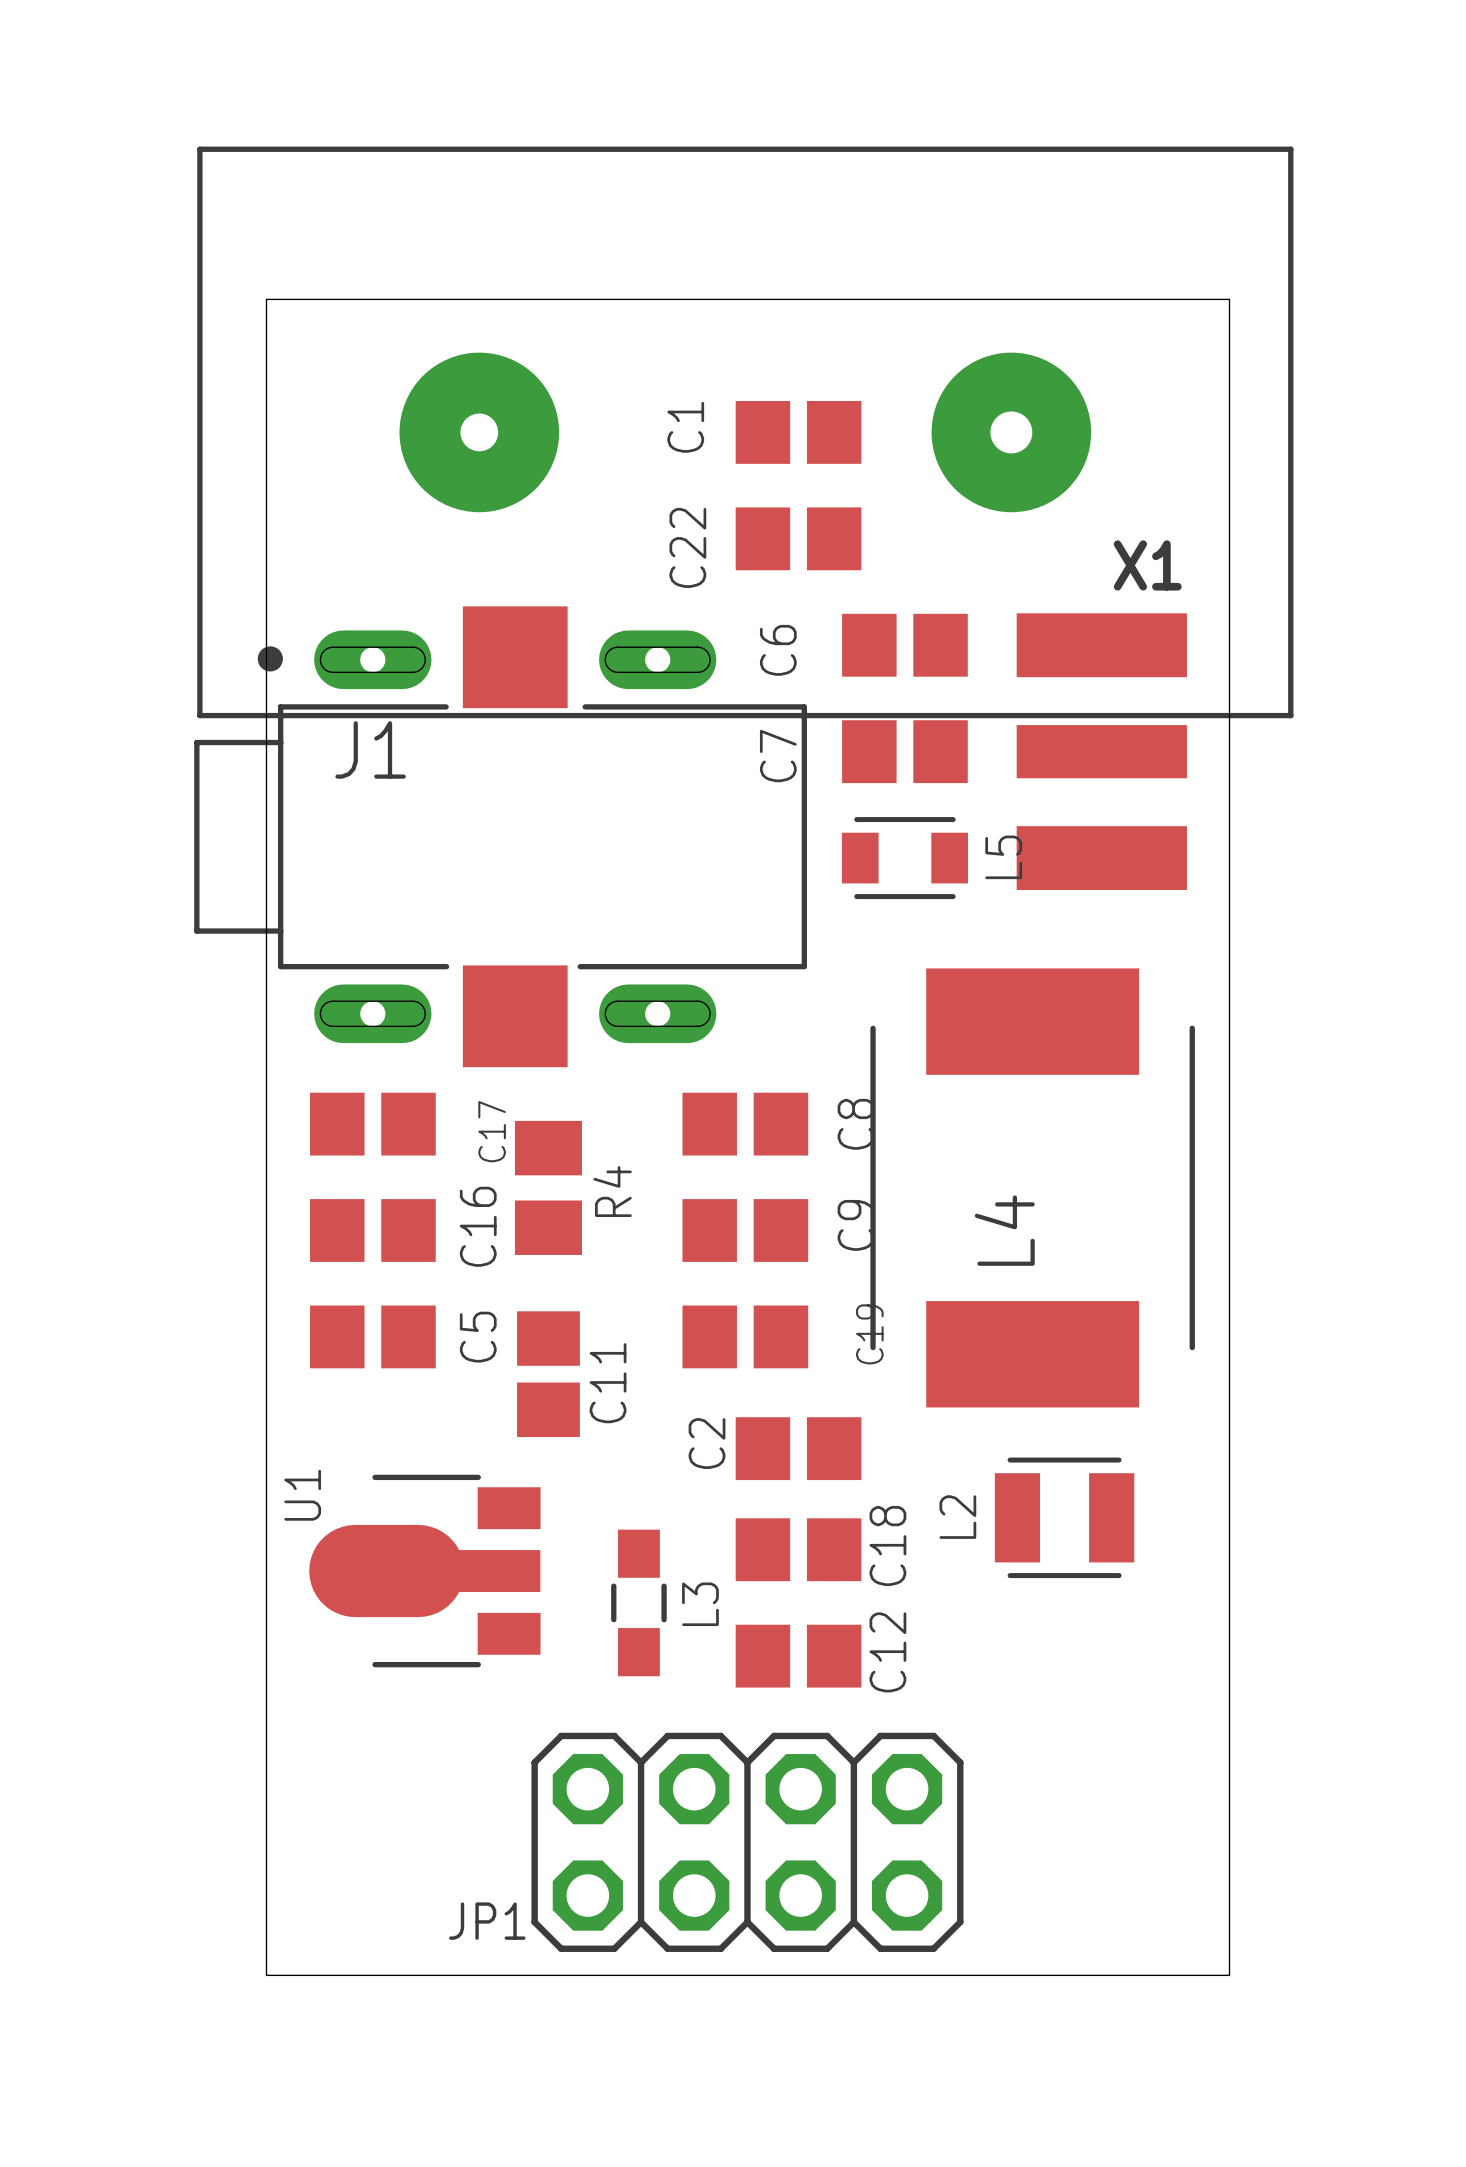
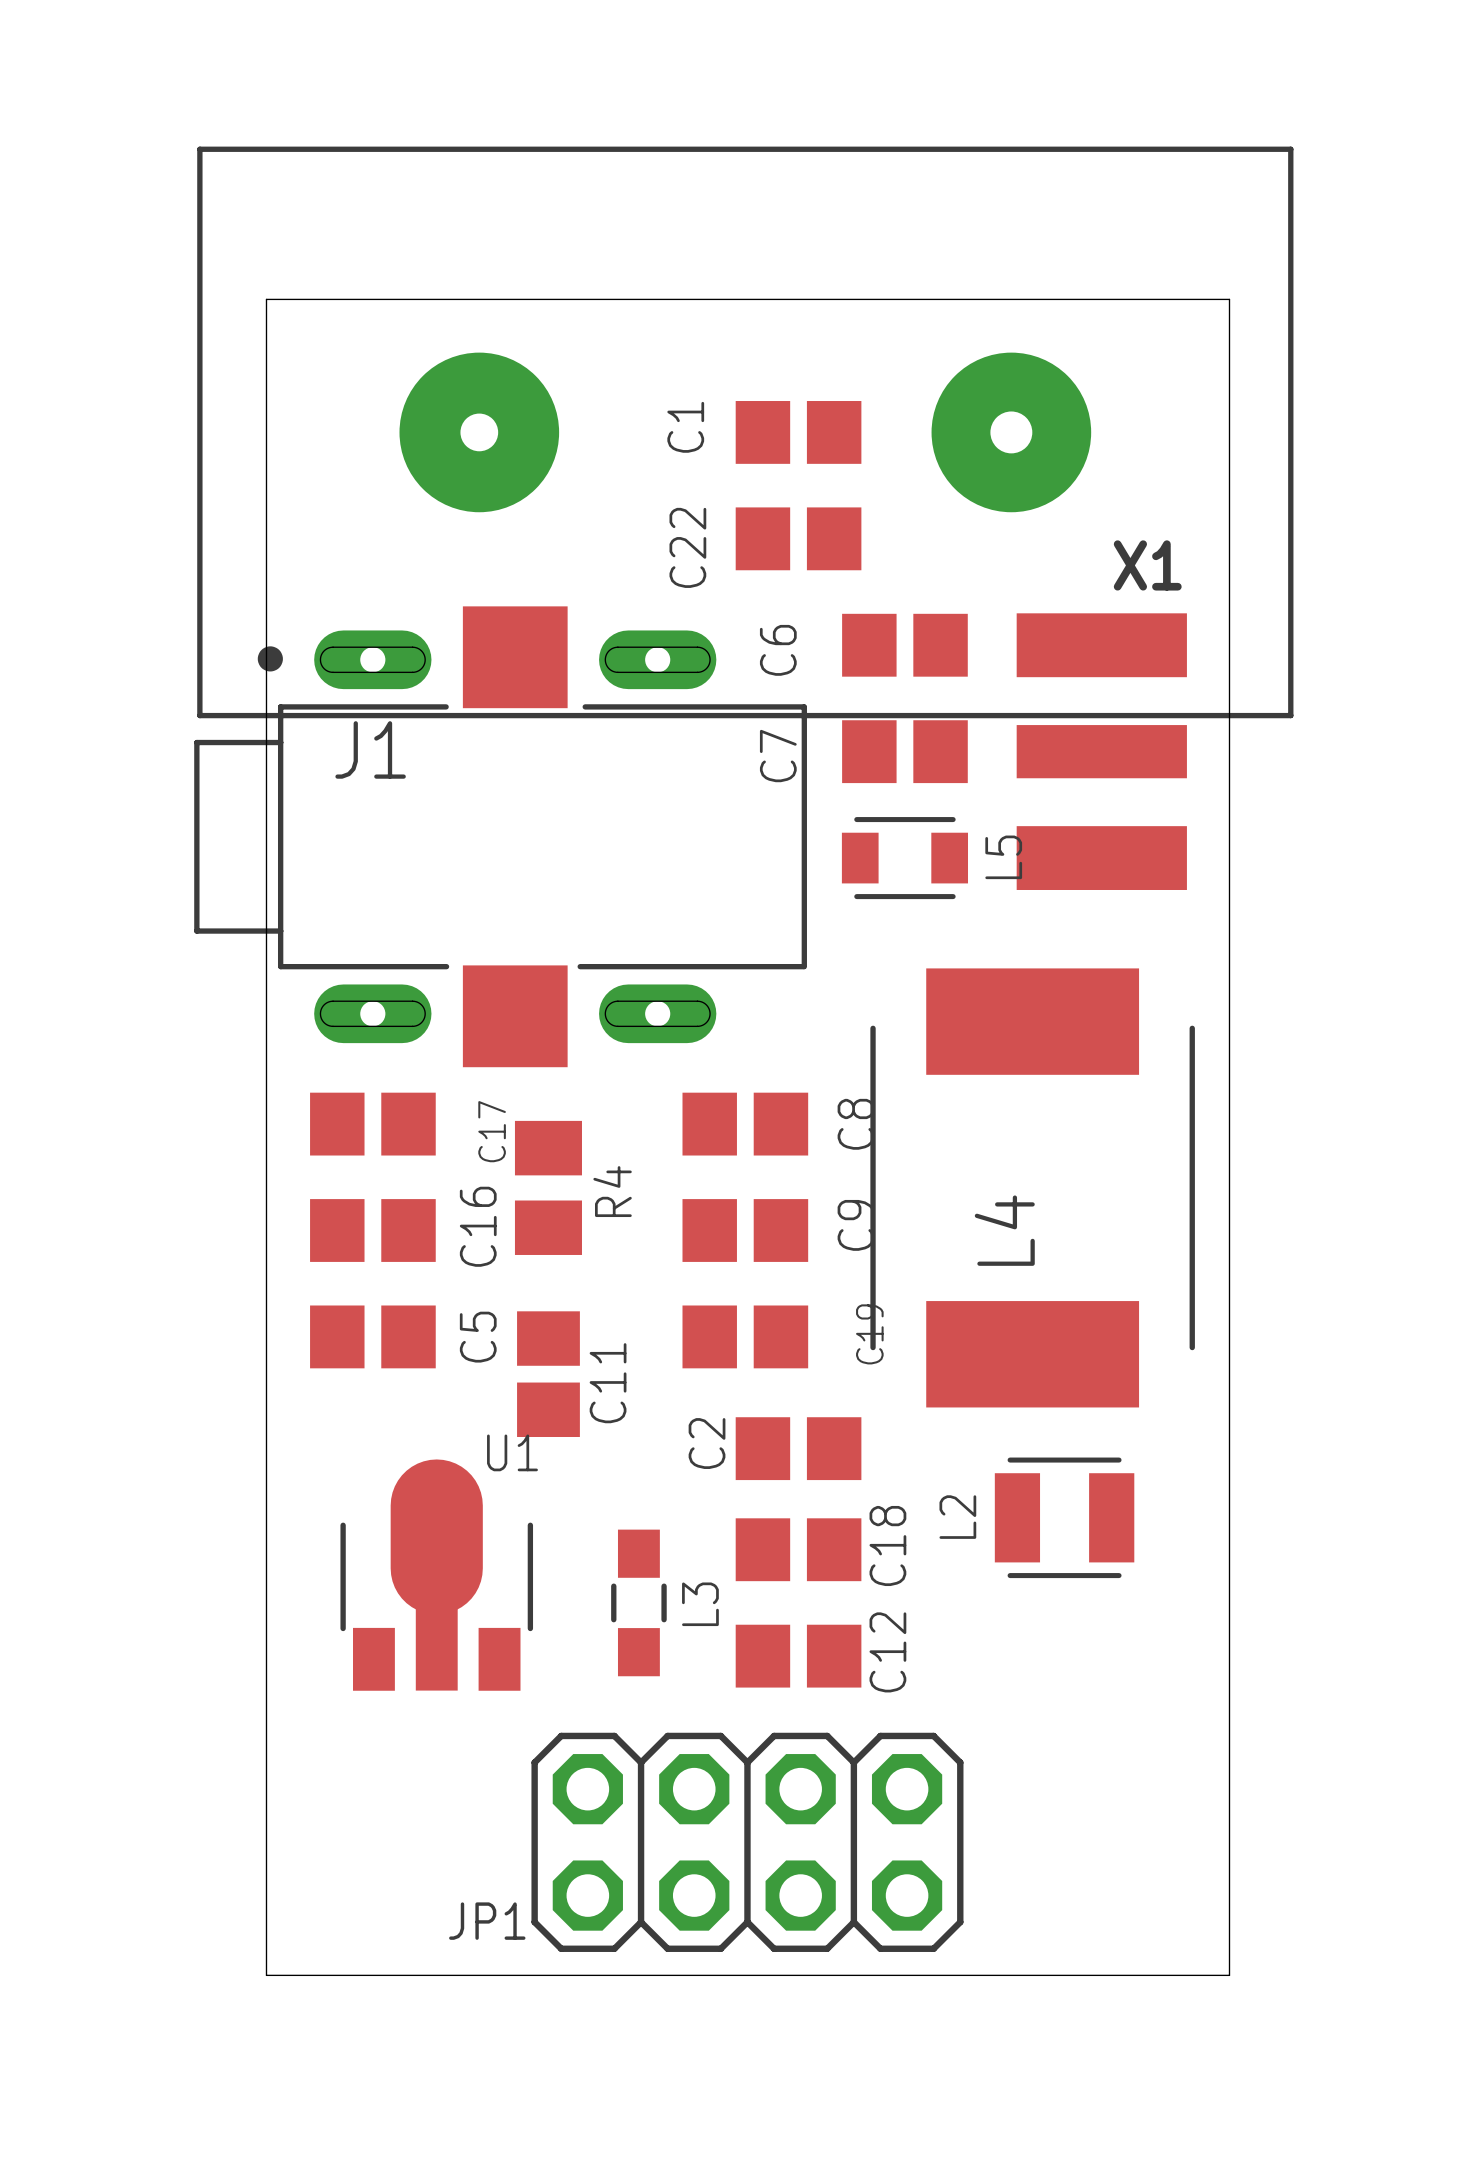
U1 rotation: 0° (424, 1571) -> 90° clockwise (436, 1575)

